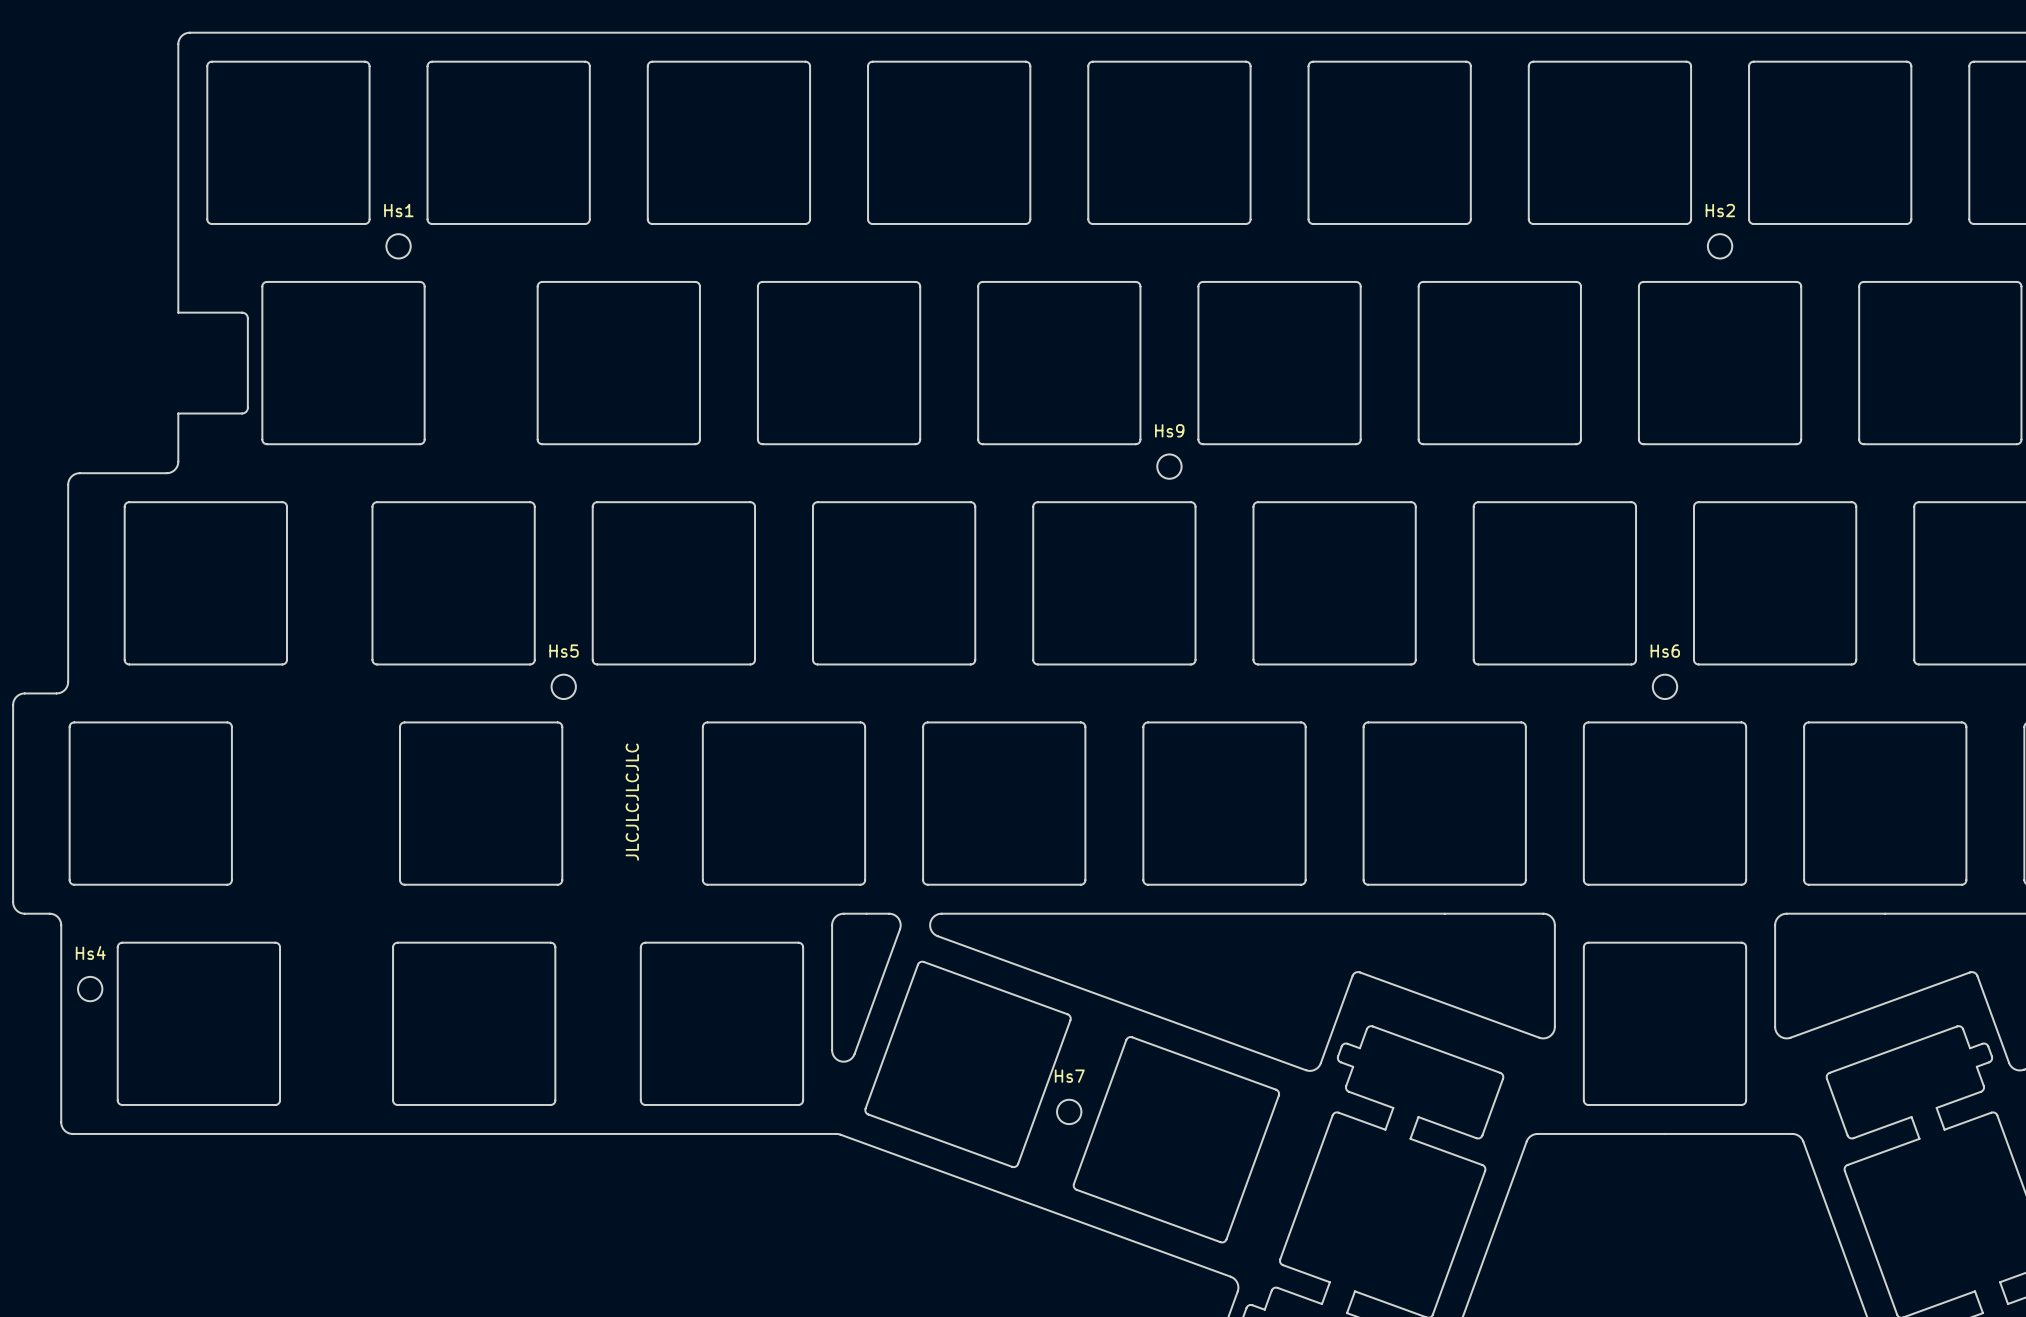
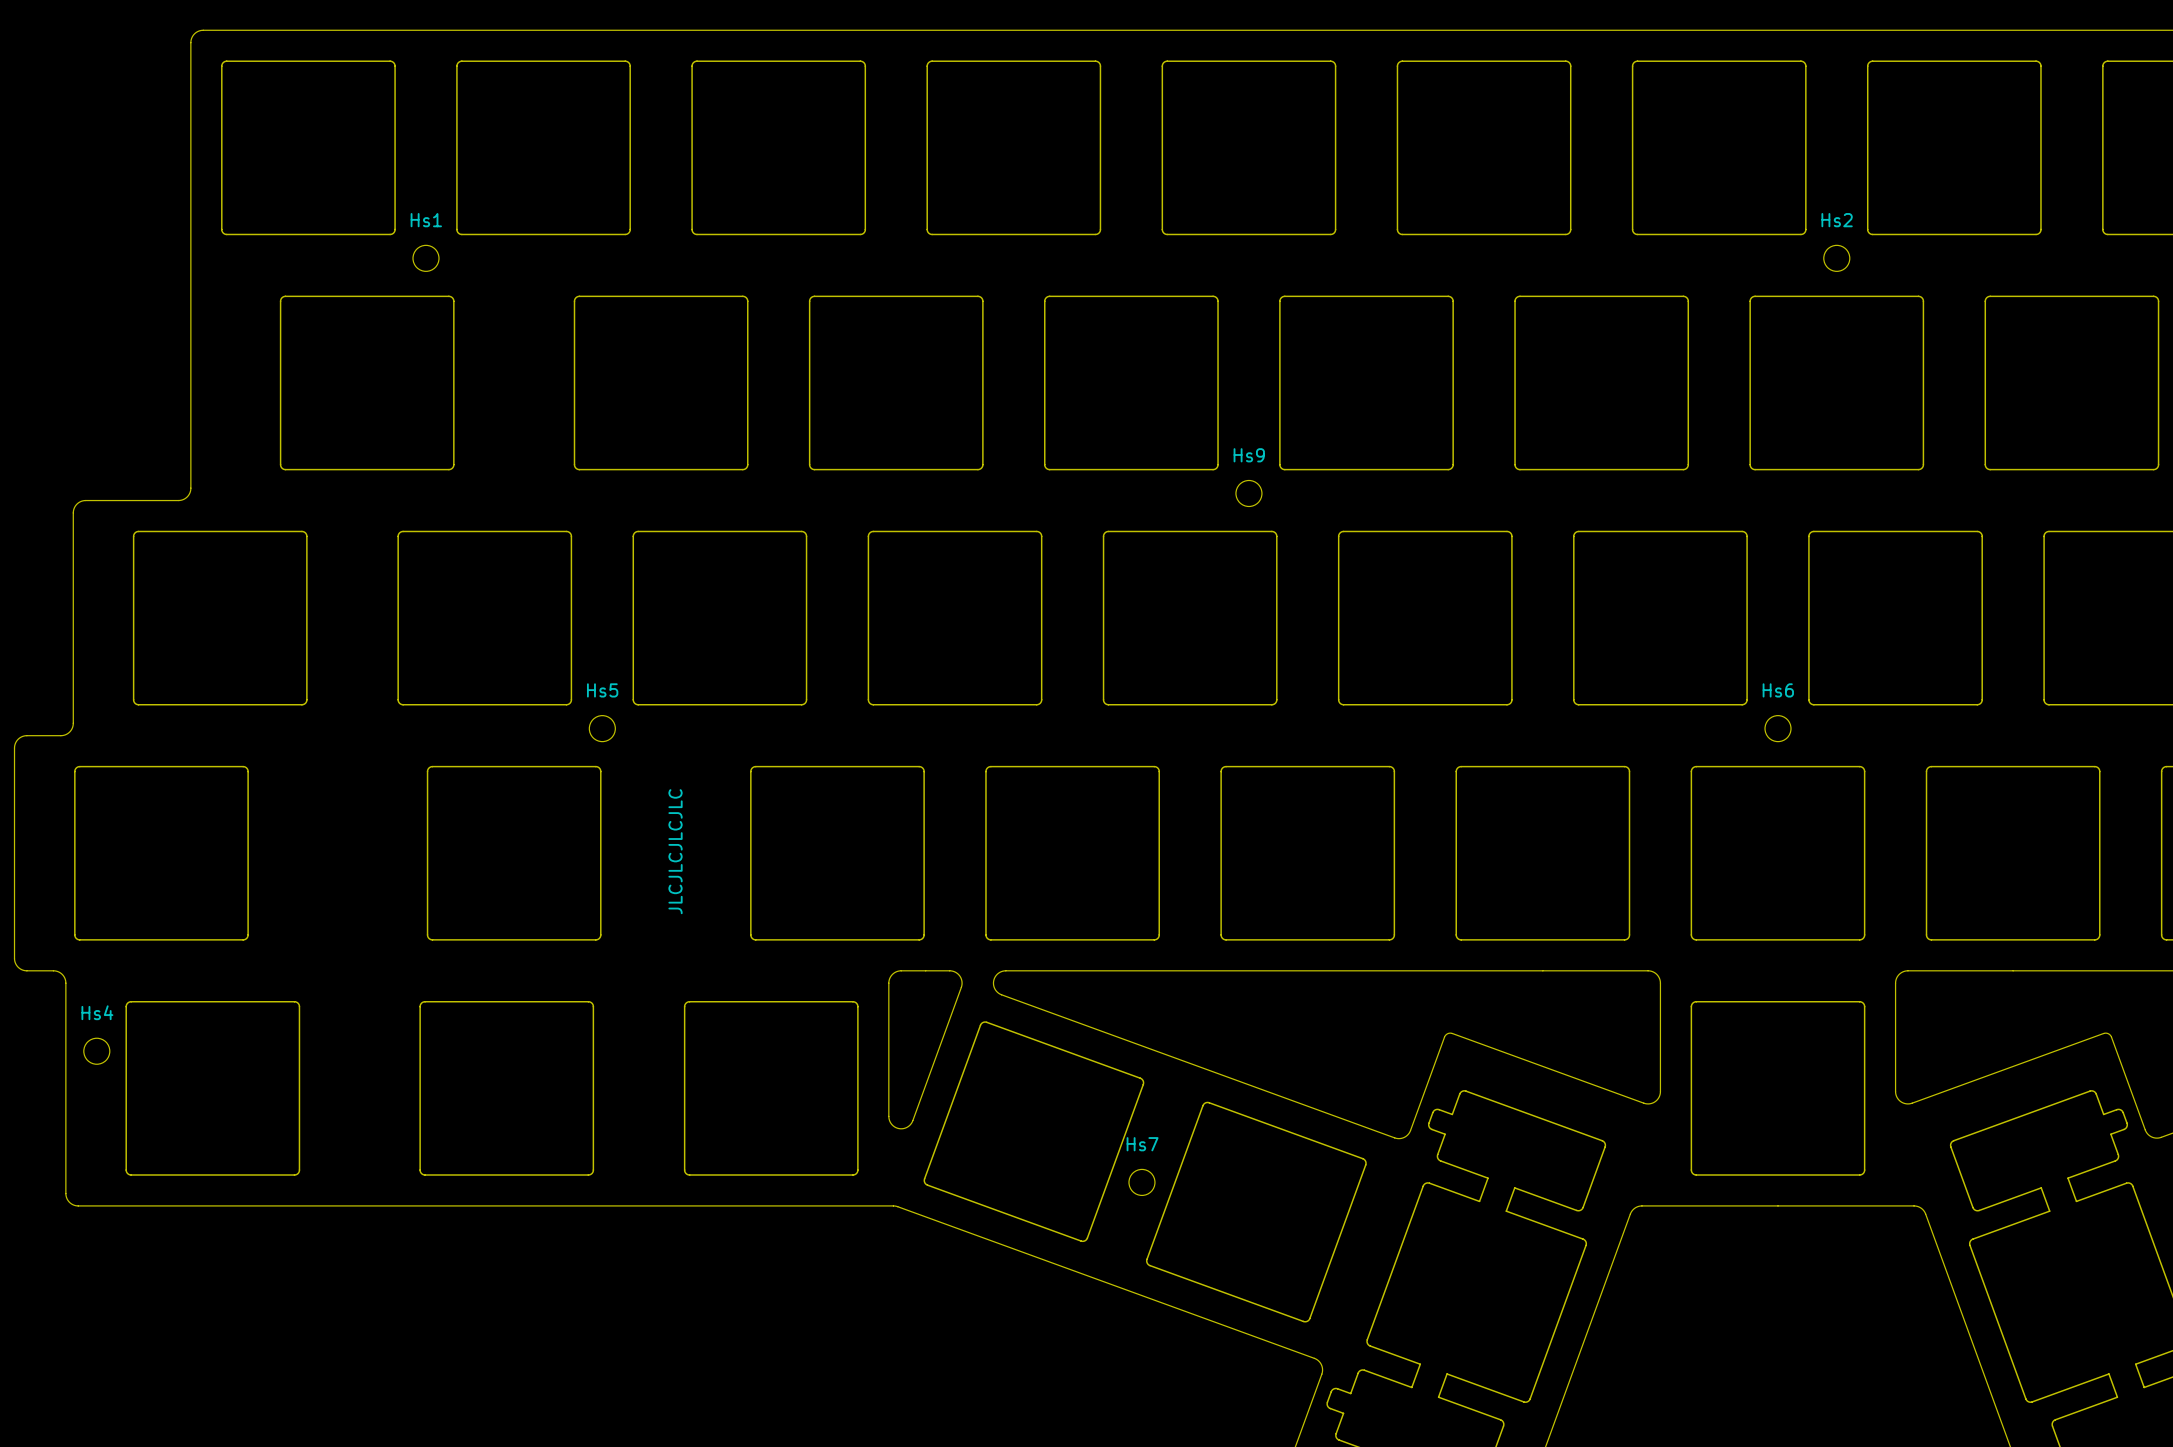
board edge: (178, 312) (242, 312) (247, 318) (246, 411) (242, 413) (178, 413) -> (190, 329) (190, 436)

